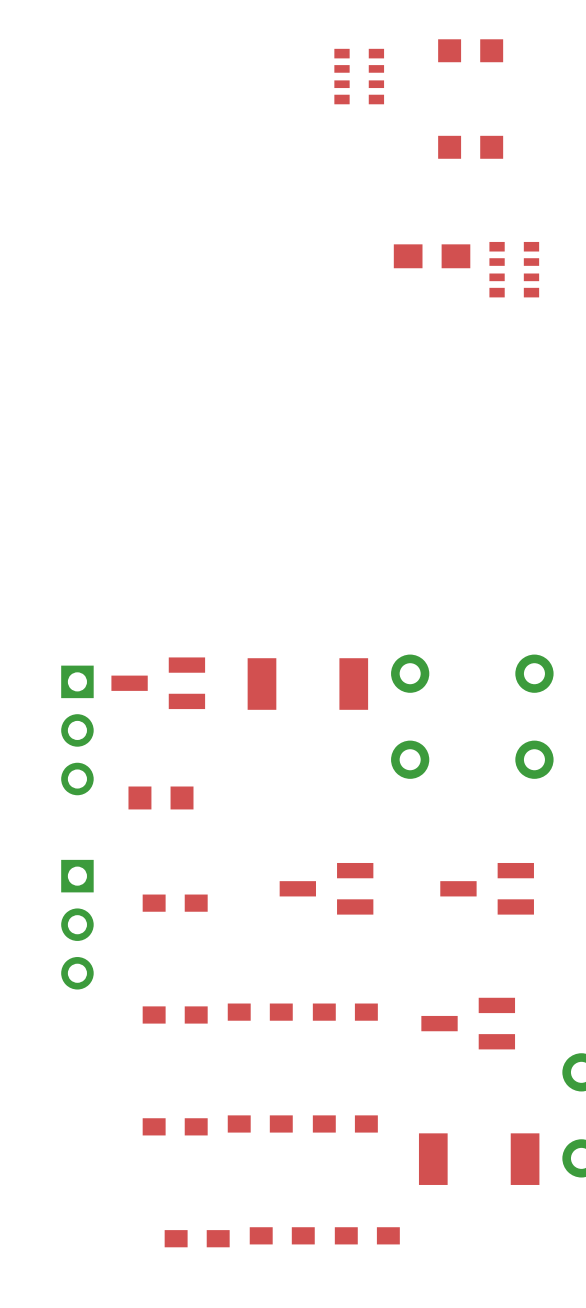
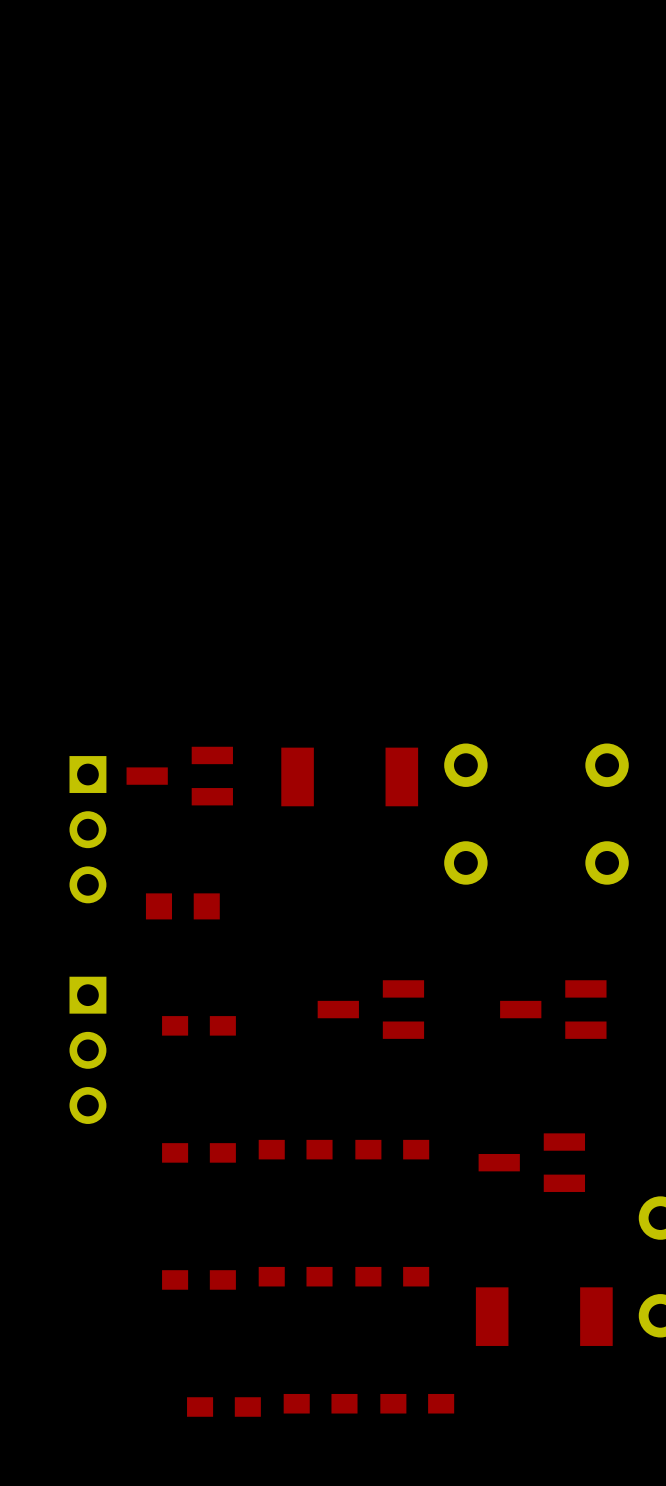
part: (470, 50) -> none
part: (359, 76) -> none
part: (470, 147) -> none
part: (432, 256) -> none
part: (514, 269) -> none

